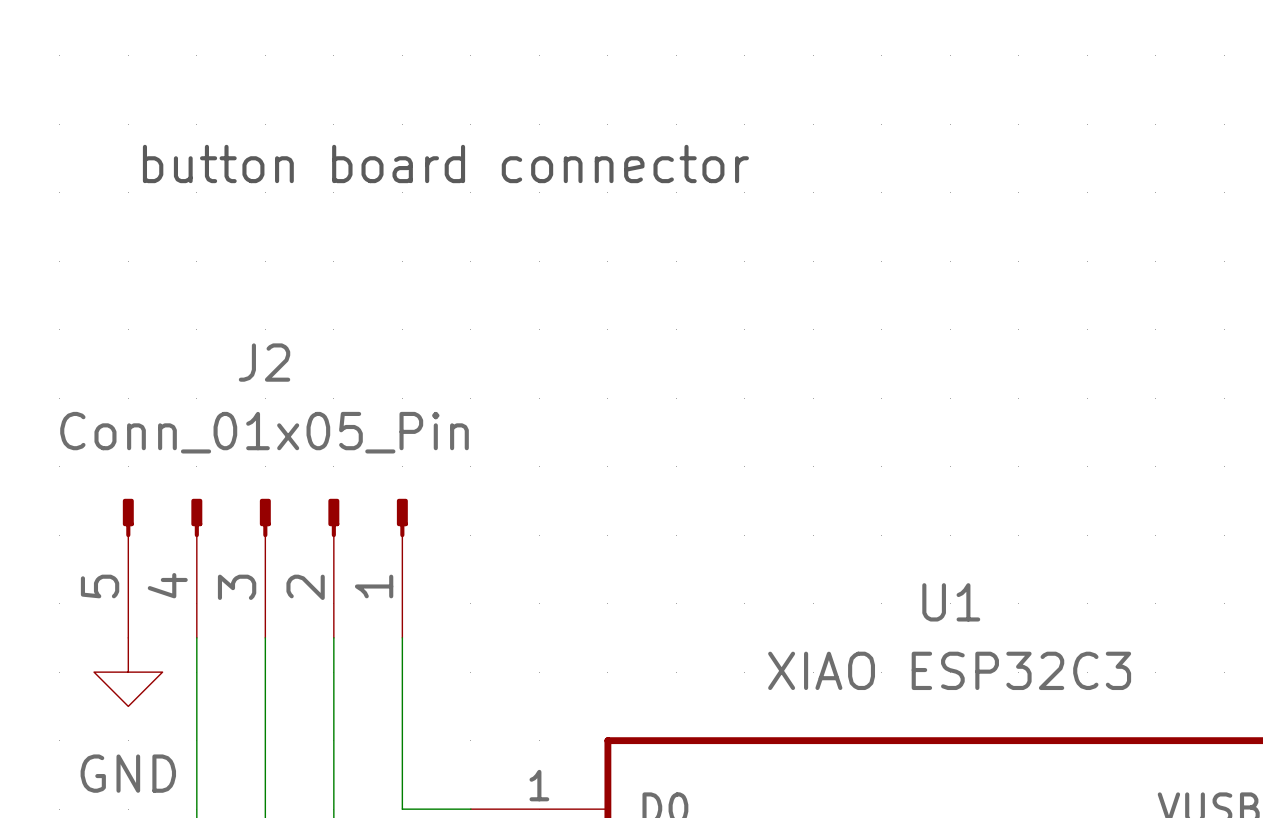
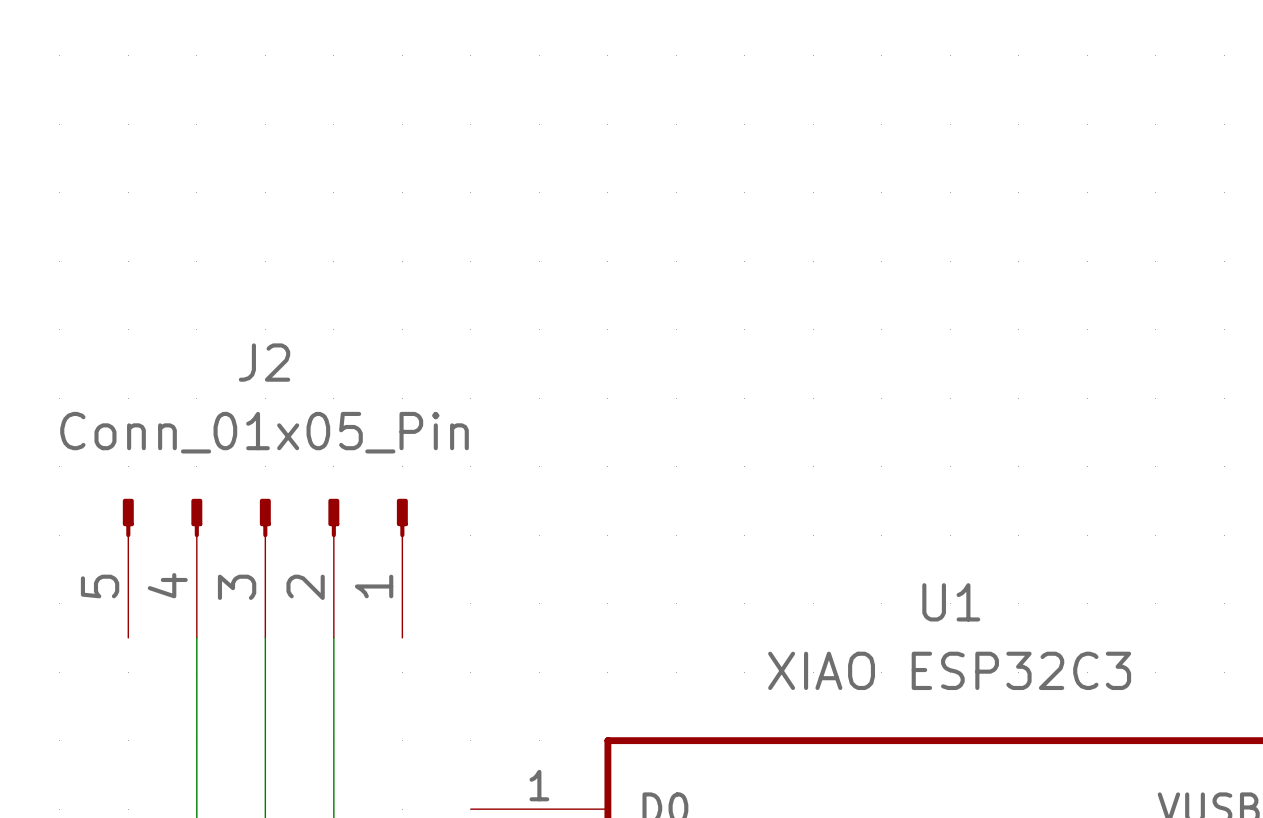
text: button board connector (445, 163) -> none
wire: (402, 637) (402, 809) (470, 809) -> none
power symbol: GND (128, 672) -> none

